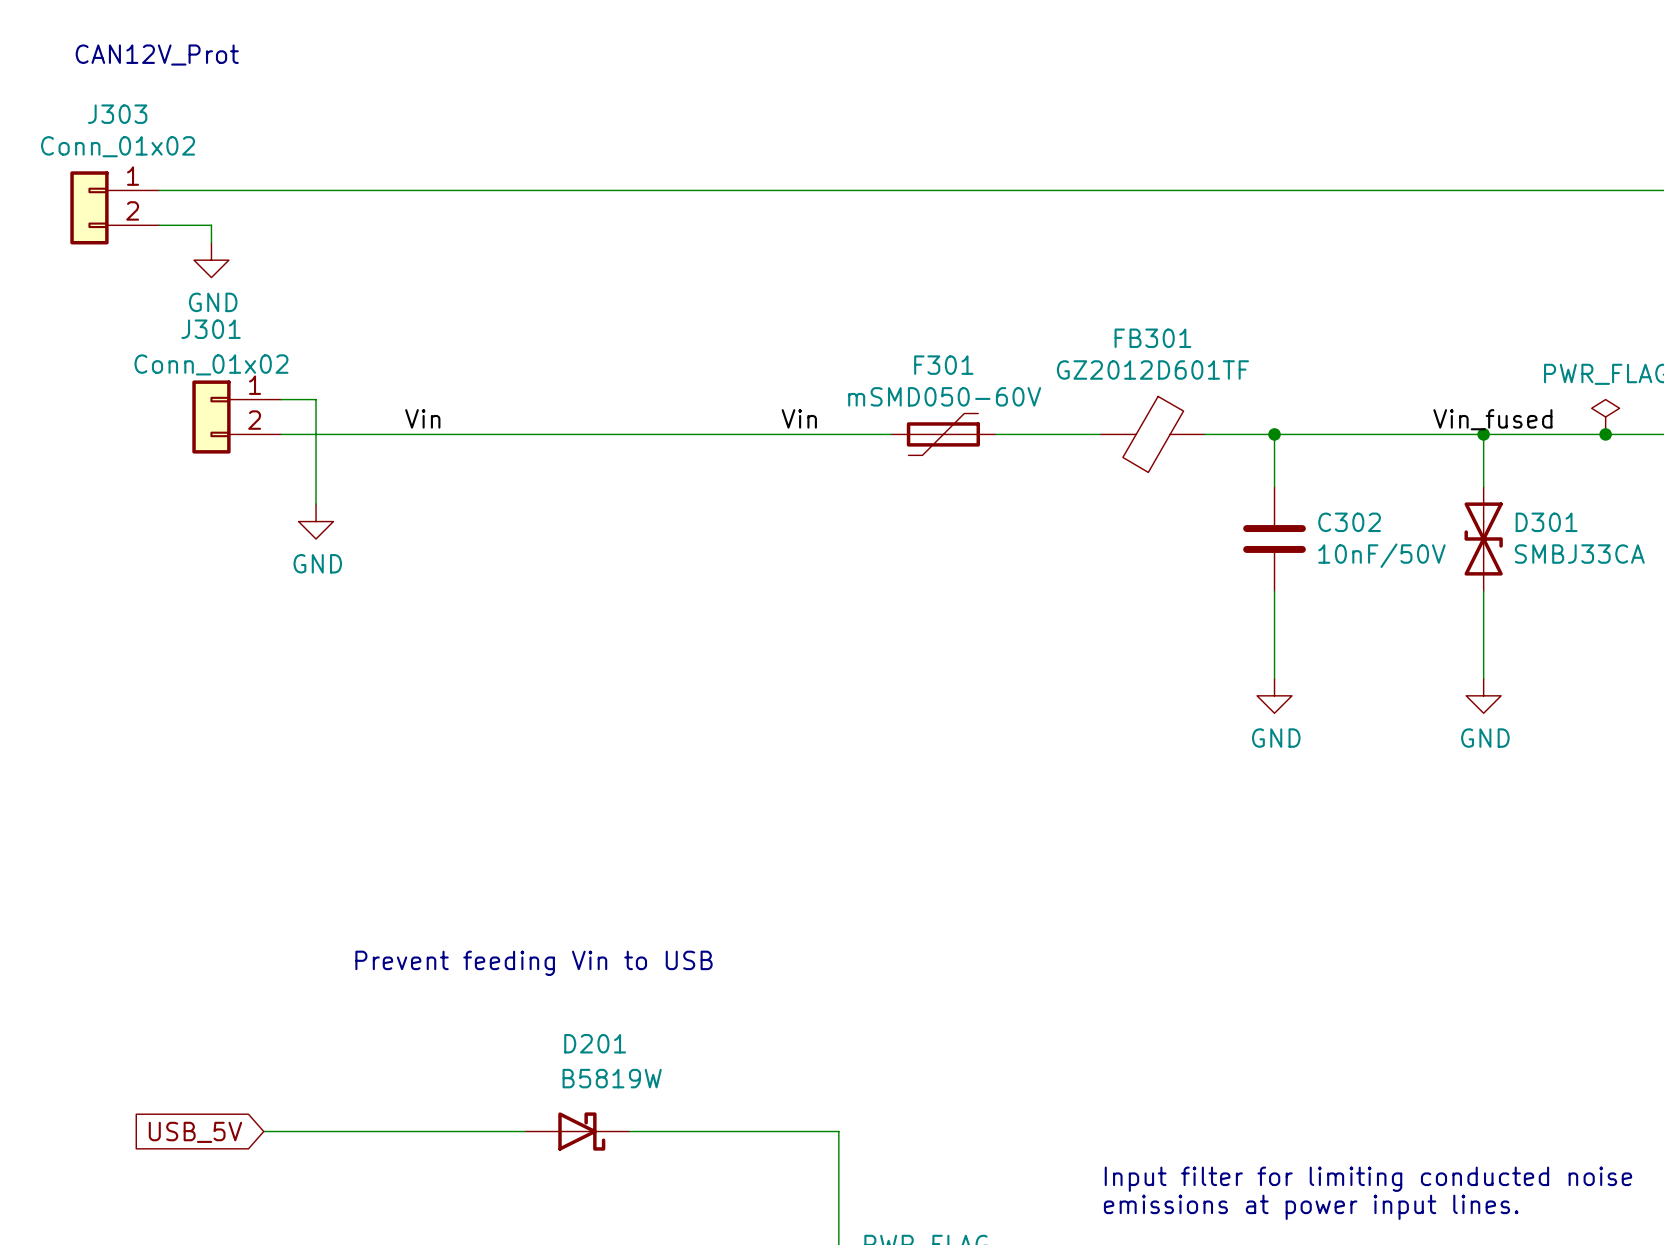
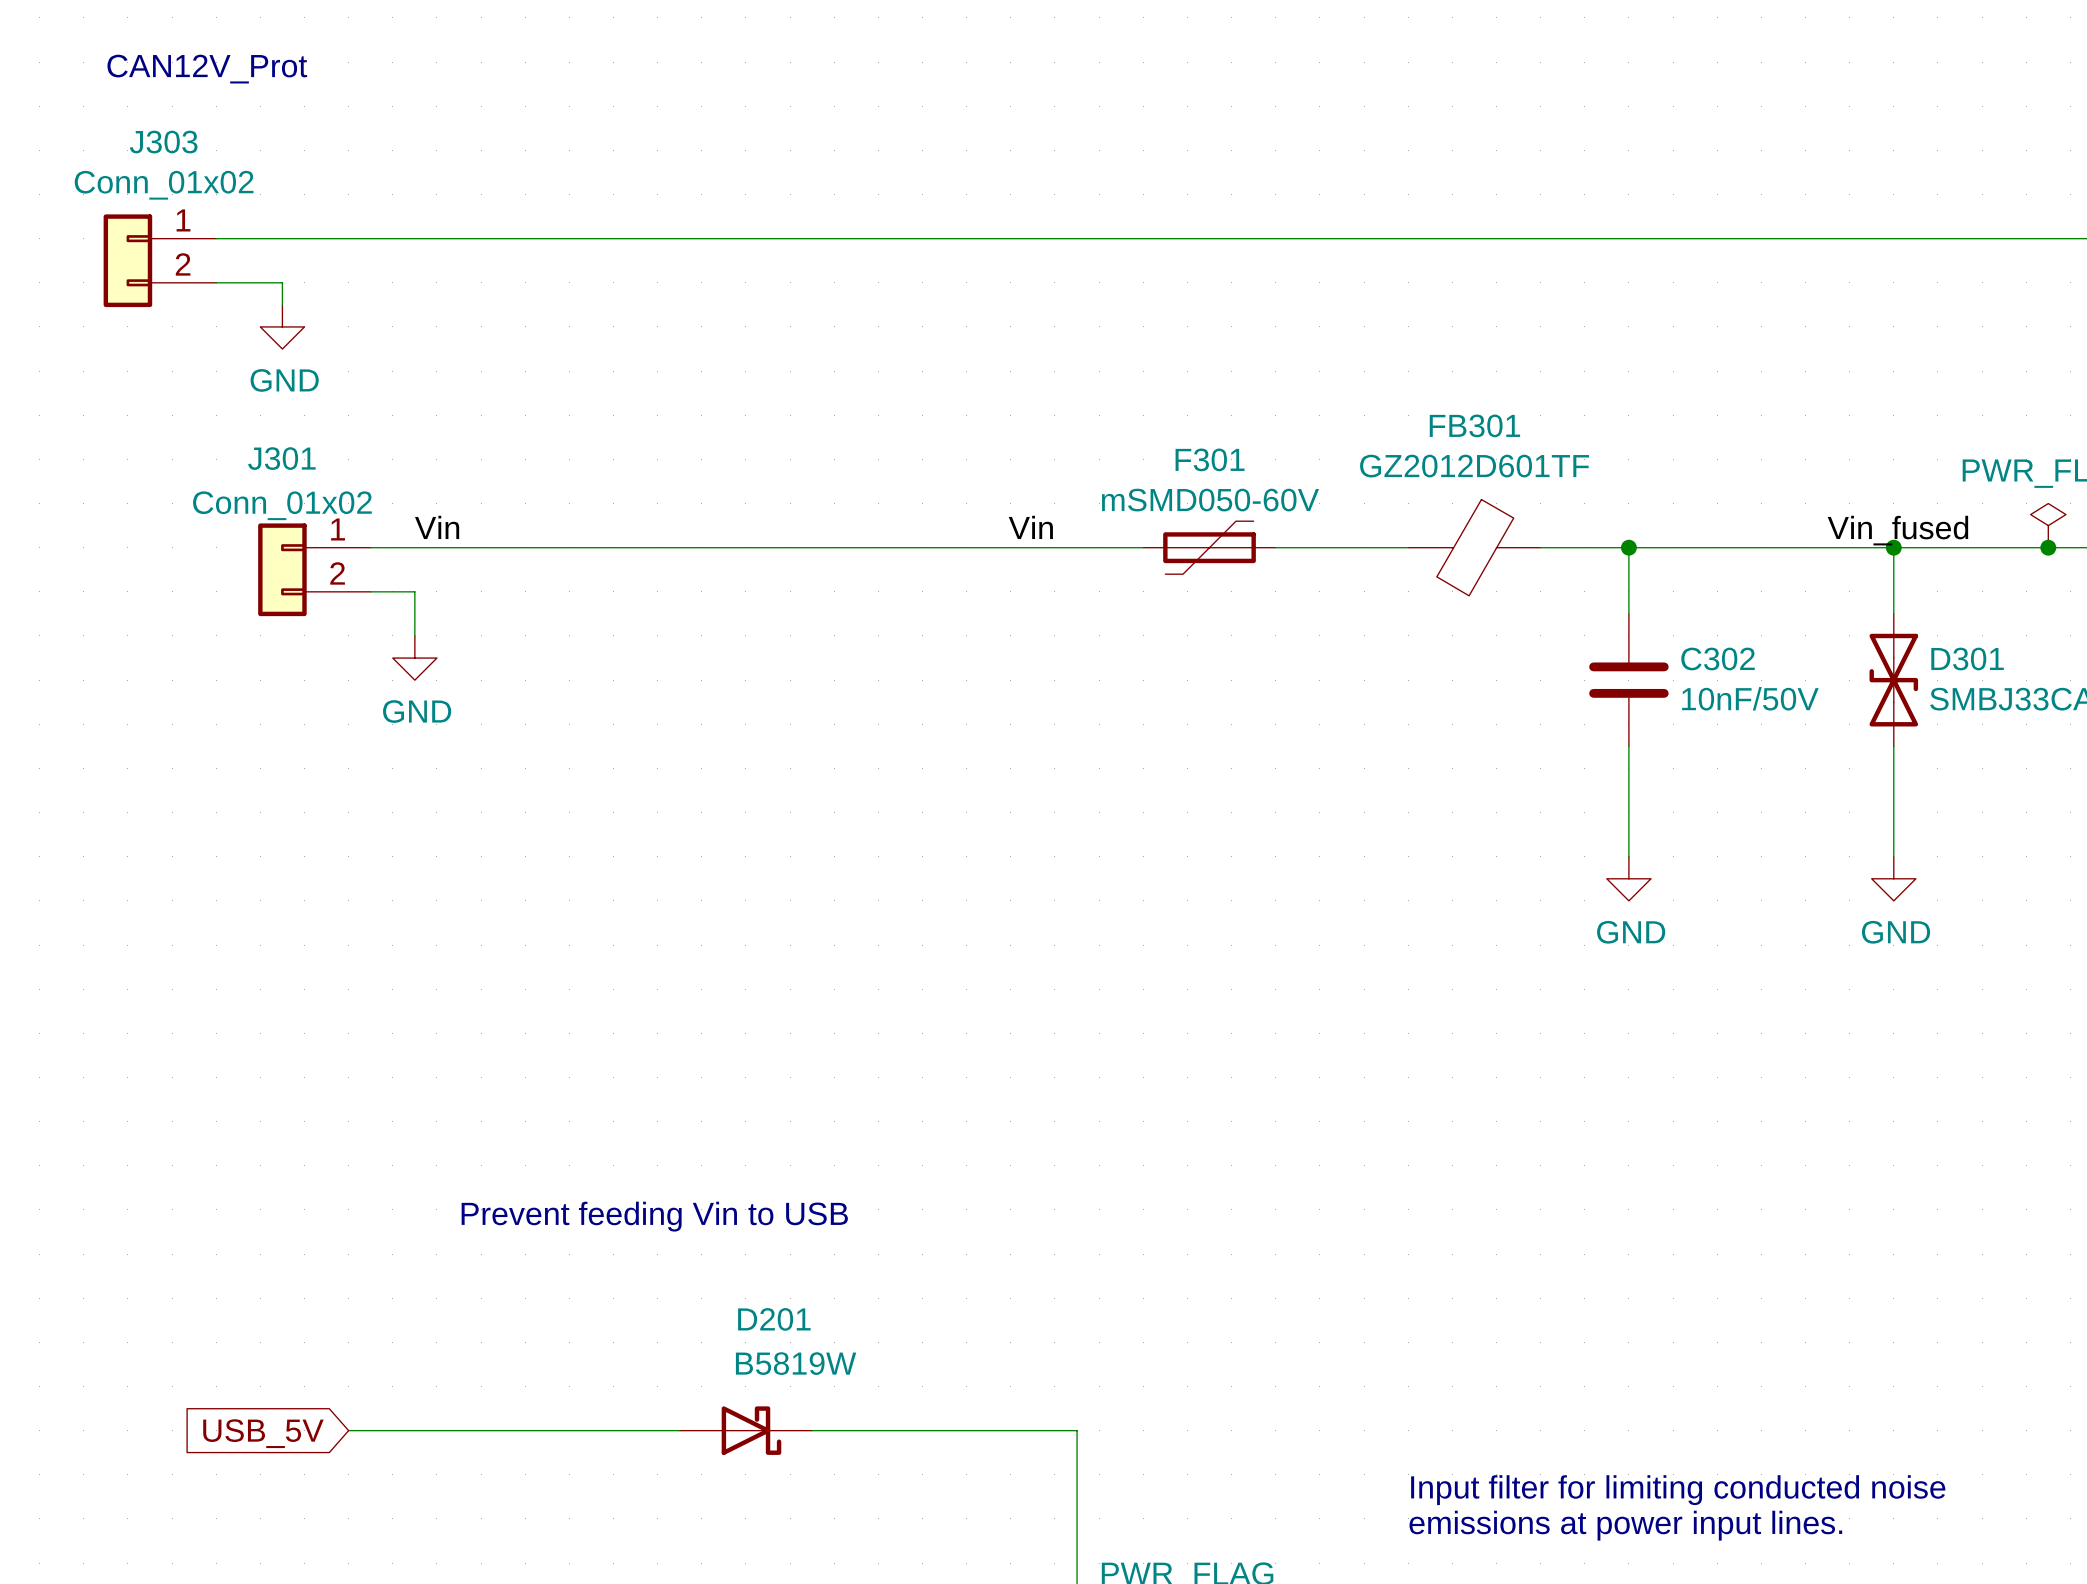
wire: (281, 399) (316, 399) (316, 469) -> (370, 591) (414, 591)
J301 position: (236, 417) -> (314, 569)
label position: Vin (422, 418) -> Vin (437, 527)

